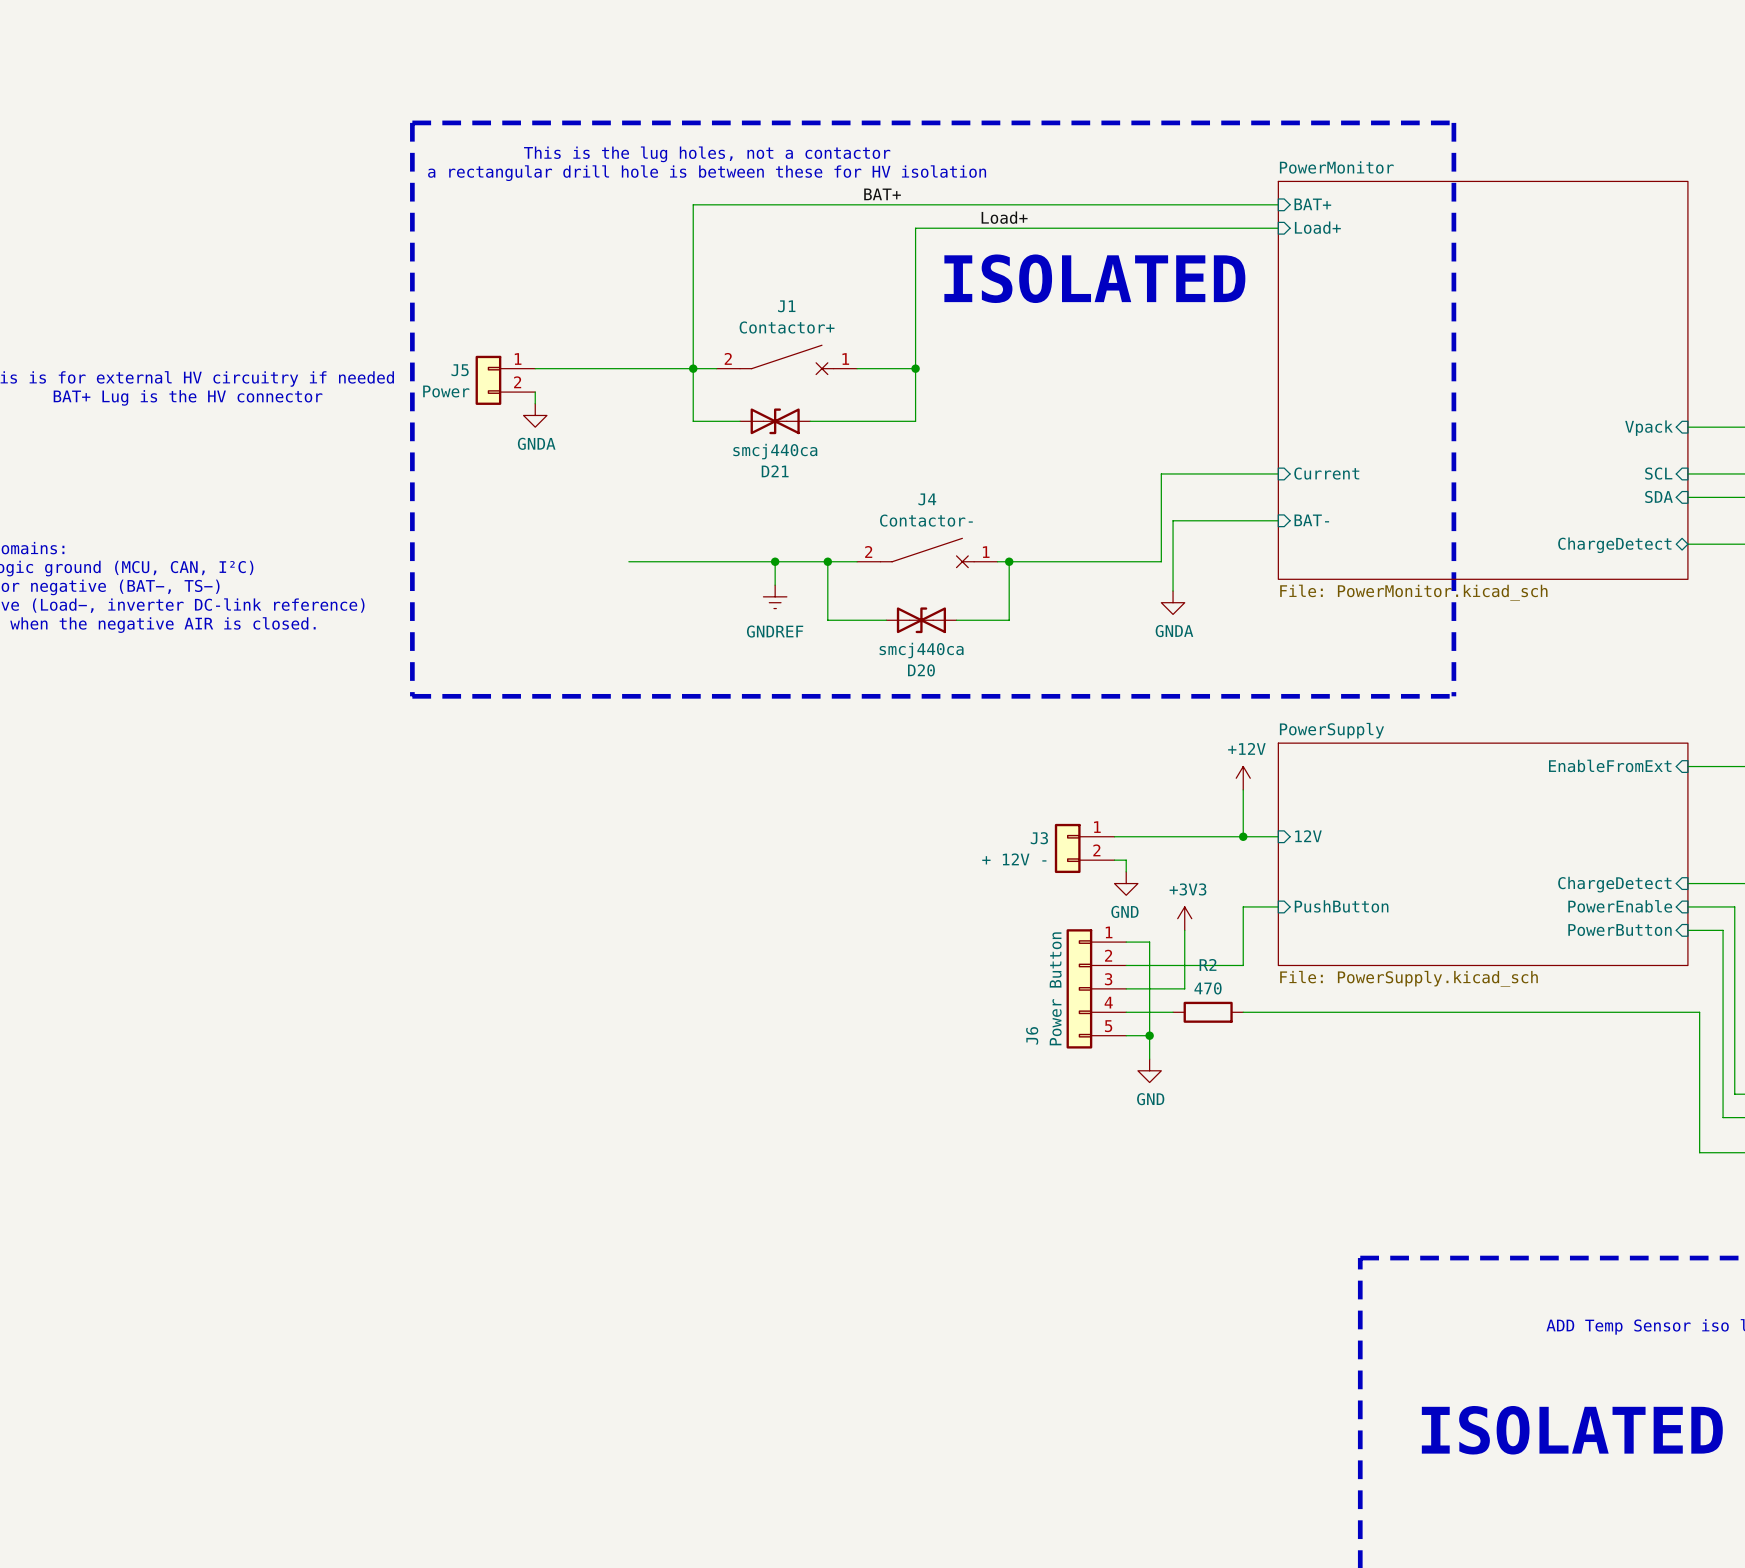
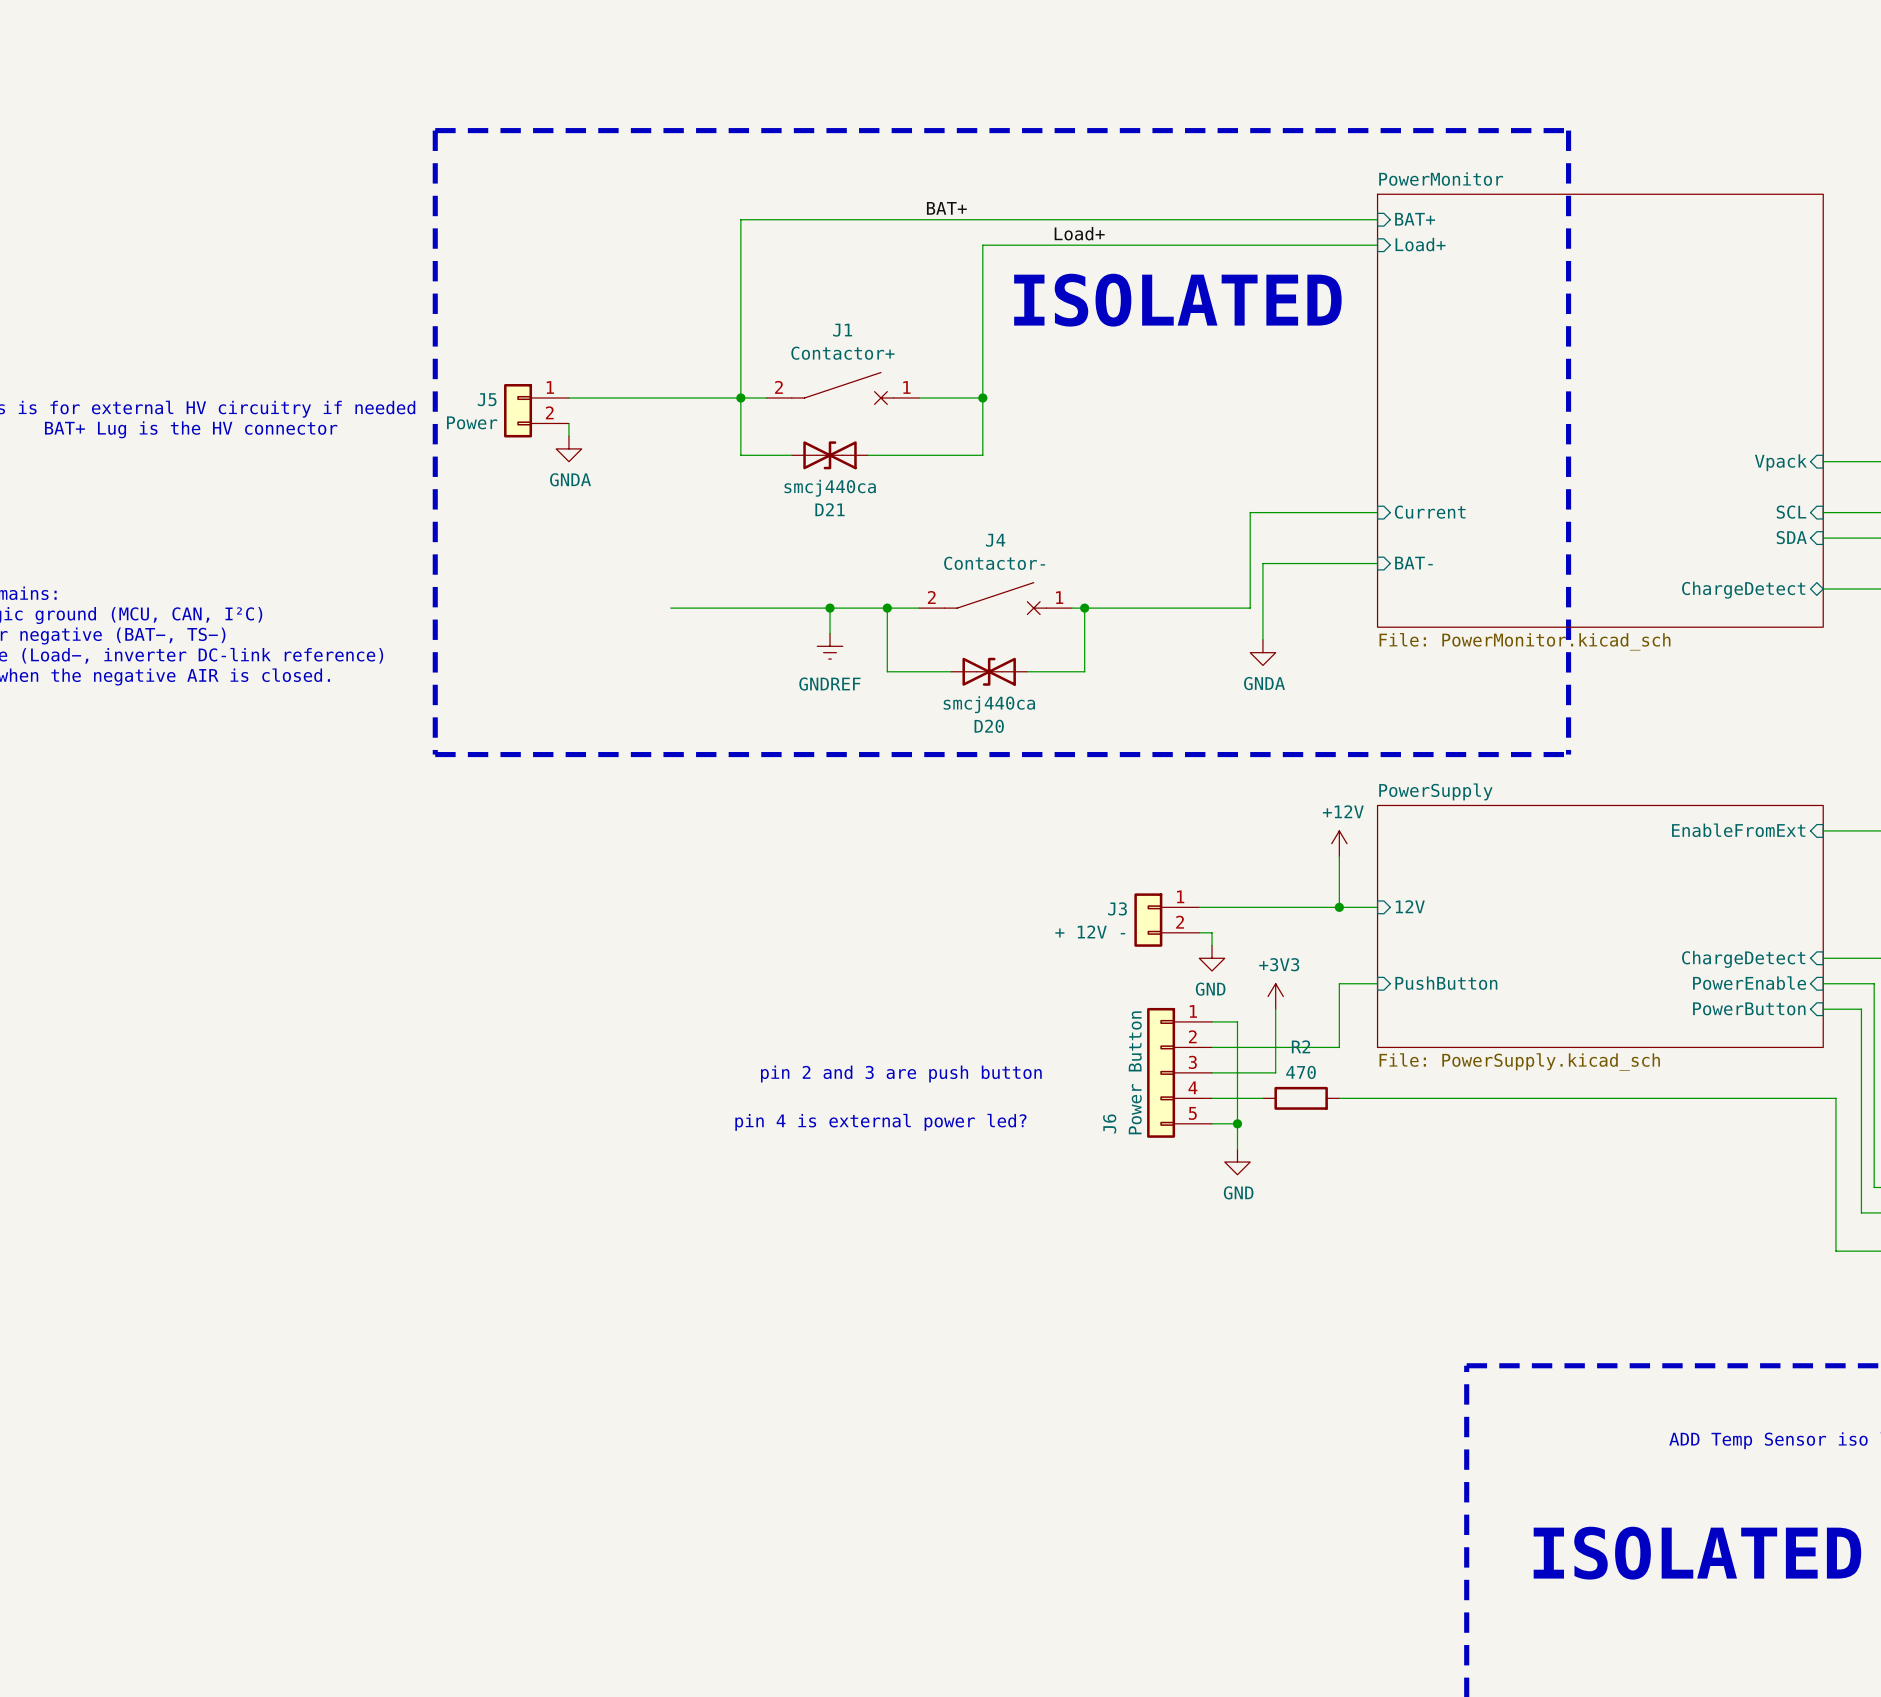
text: This is the lug holes, not a contactor (707, 154) -> none
text: a rectangular drill hole is between these for HV isolation (707, 173) -> none
text: none -> pin 2 and 3 are push button (901, 1073)
text: none -> pin 4 is external power led? (880, 1122)

